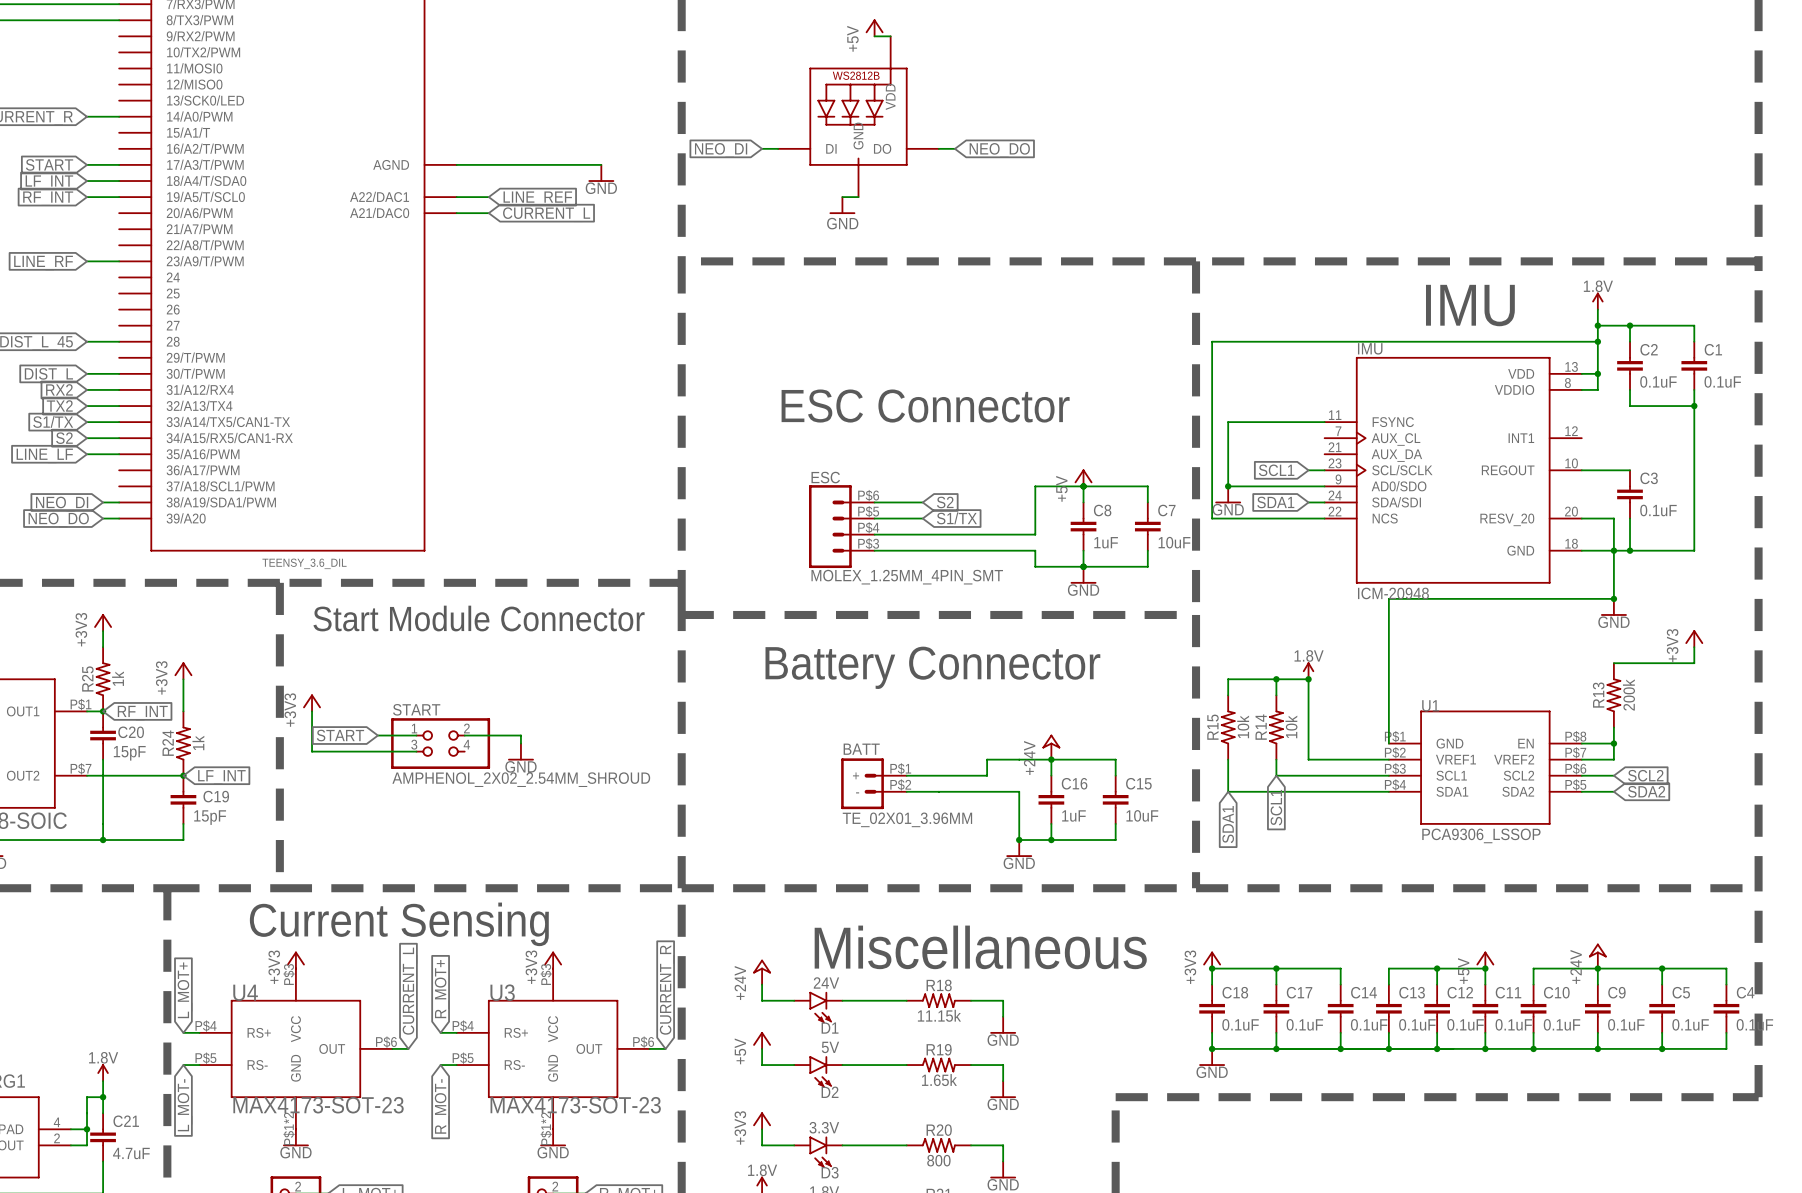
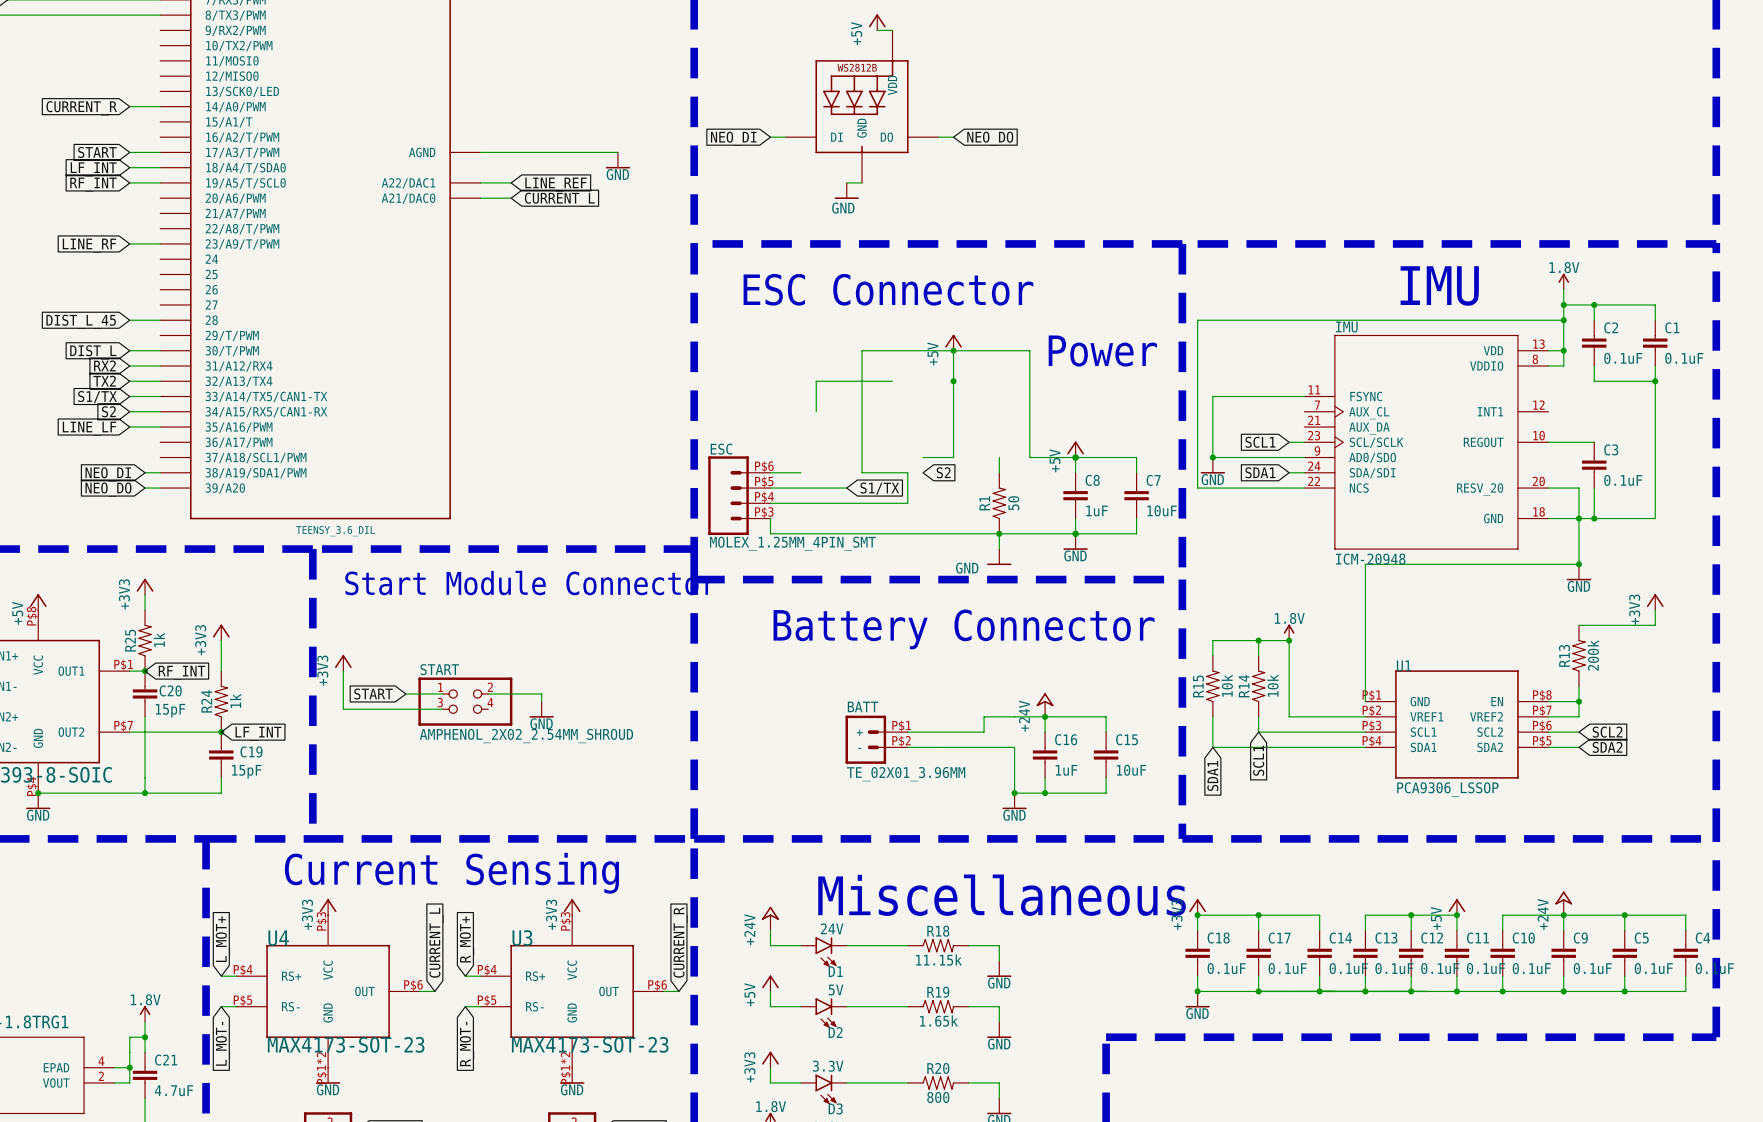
power symbol: none -> +5V (953, 342)
wire: none -> (953, 350) (953, 457) (923, 457)
junction: none -> (953, 350)
text: none -> Power (1102, 351)
wire: none -> (892, 381) (816, 381) (816, 411)
text position: ESC Connector (925, 406) -> ESC Connector (888, 289)
junction: none -> (953, 381)
wire: none -> (999, 457) (999, 472)
wire: (1035, 486) (1035, 534) (906, 534) -> (1029, 457) (1029, 350) (862, 350) (862, 472) (877, 472)
wire: none -> (770, 472) (800, 472)
wire: (906, 502) (922, 502) -> (907, 472) (907, 503)
wire: none -> (770, 488) (846, 488)
wire: (874, 518) (922, 518) -> none
global label position: S1/TX (956, 518) -> S1/TX (879, 488)
ESC position: (841, 526) -> (739, 495)
wire: none -> (770, 503) (877, 503)
R1: none -> 50 (999, 503)
wire: (874, 550) (1035, 550) (1035, 566) -> (770, 518) (770, 533) (1029, 533)
wire: none -> (999, 533) (999, 549)
junction: none -> (999, 533)
power symbol: none -> GND (999, 557)

